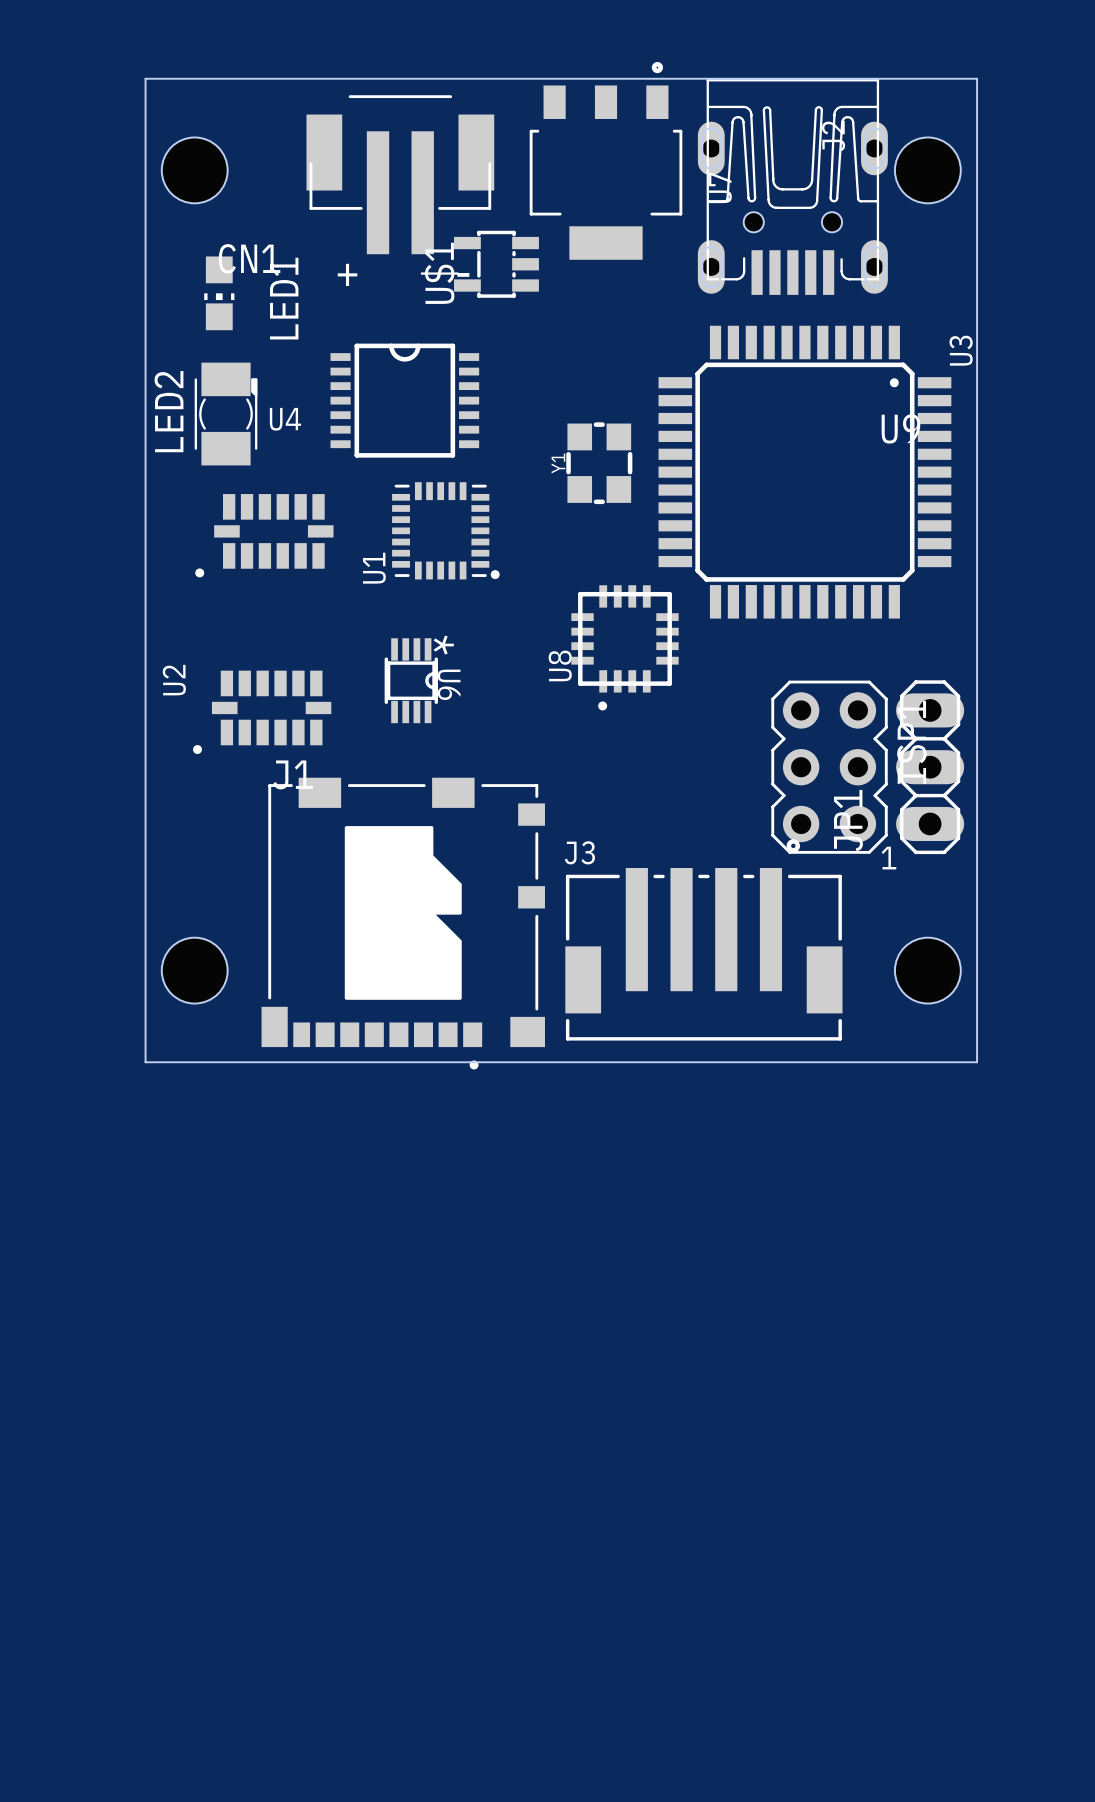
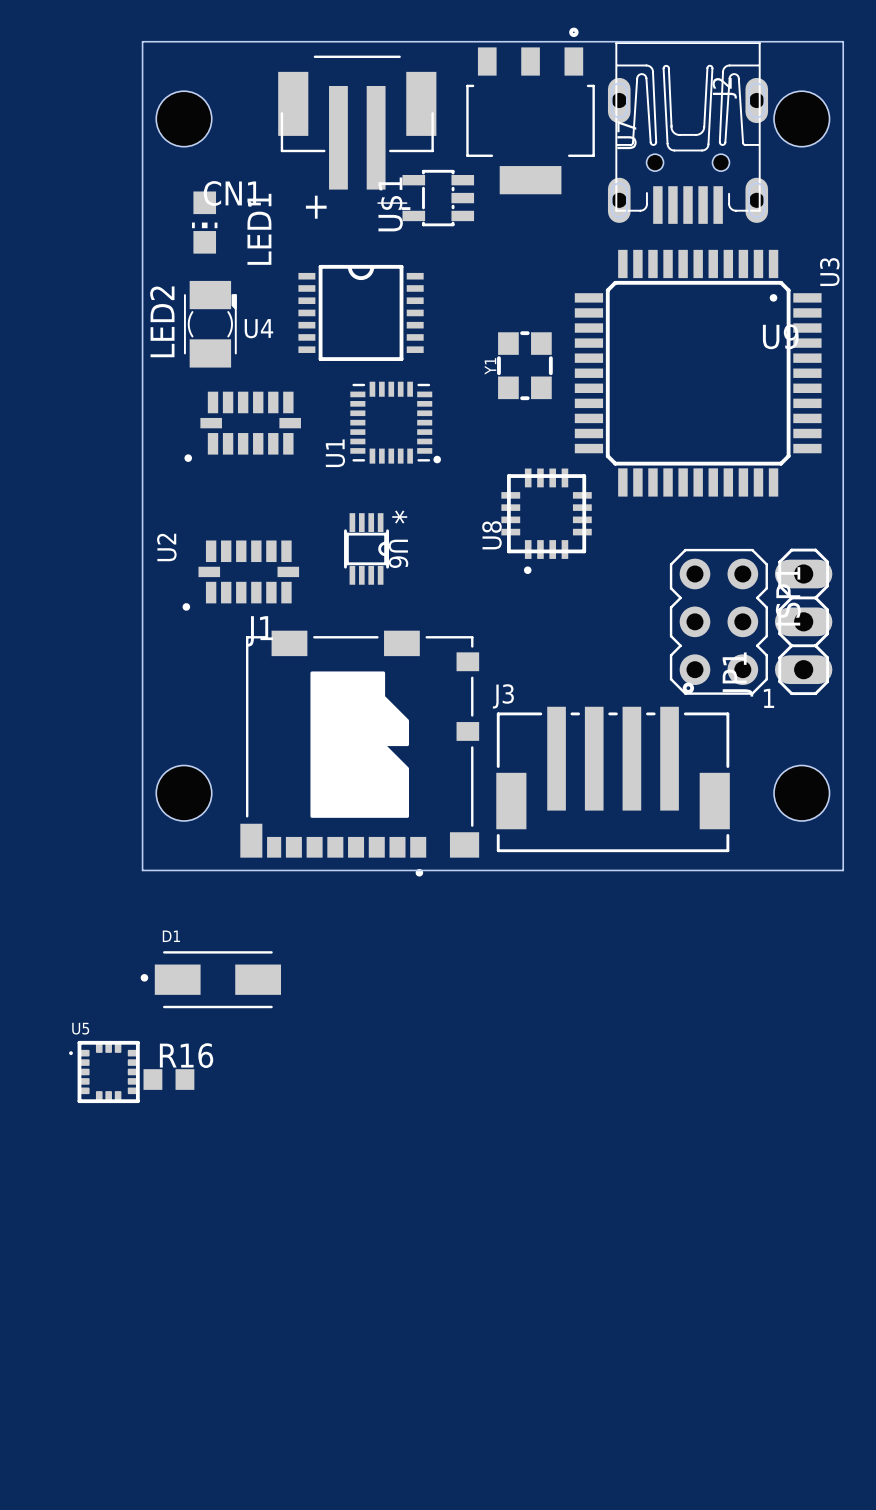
D1: none -> (210, 979)
U5: none -> (104, 1071)
R16: none -> (168, 1079)

